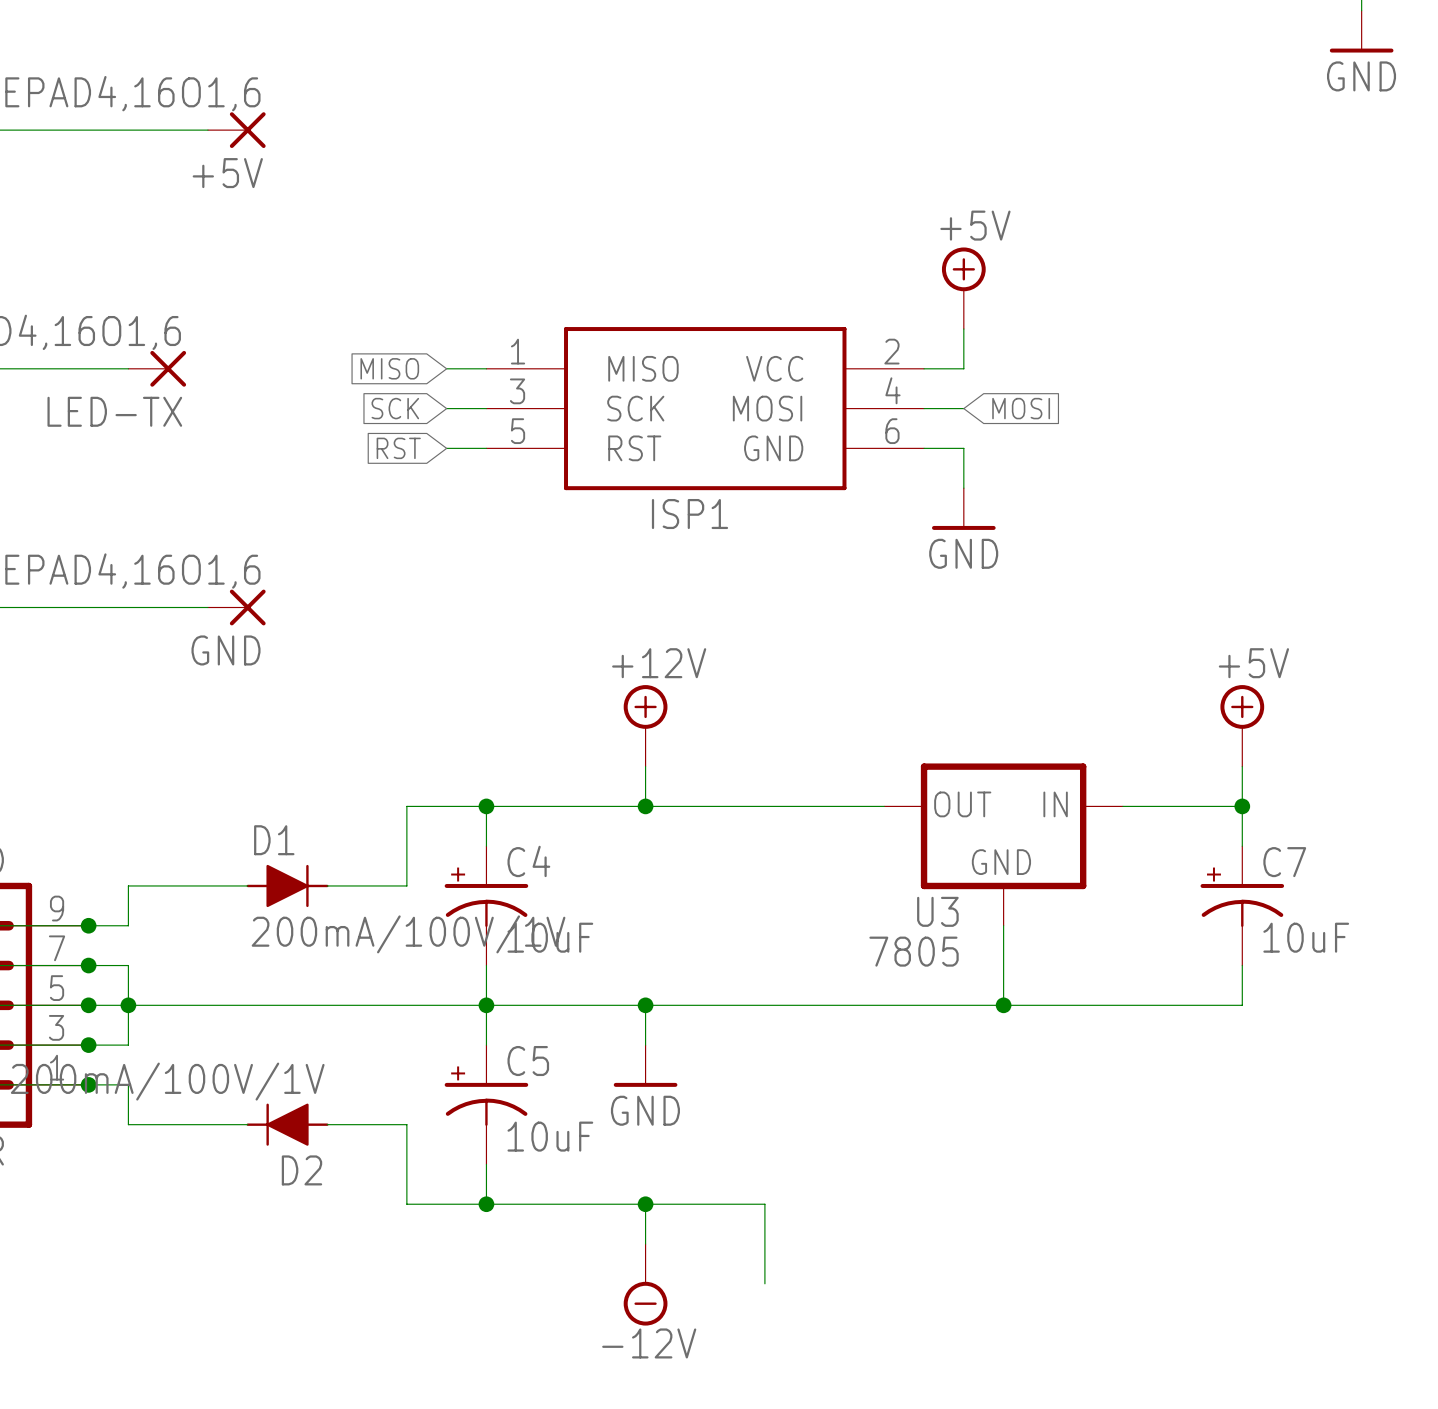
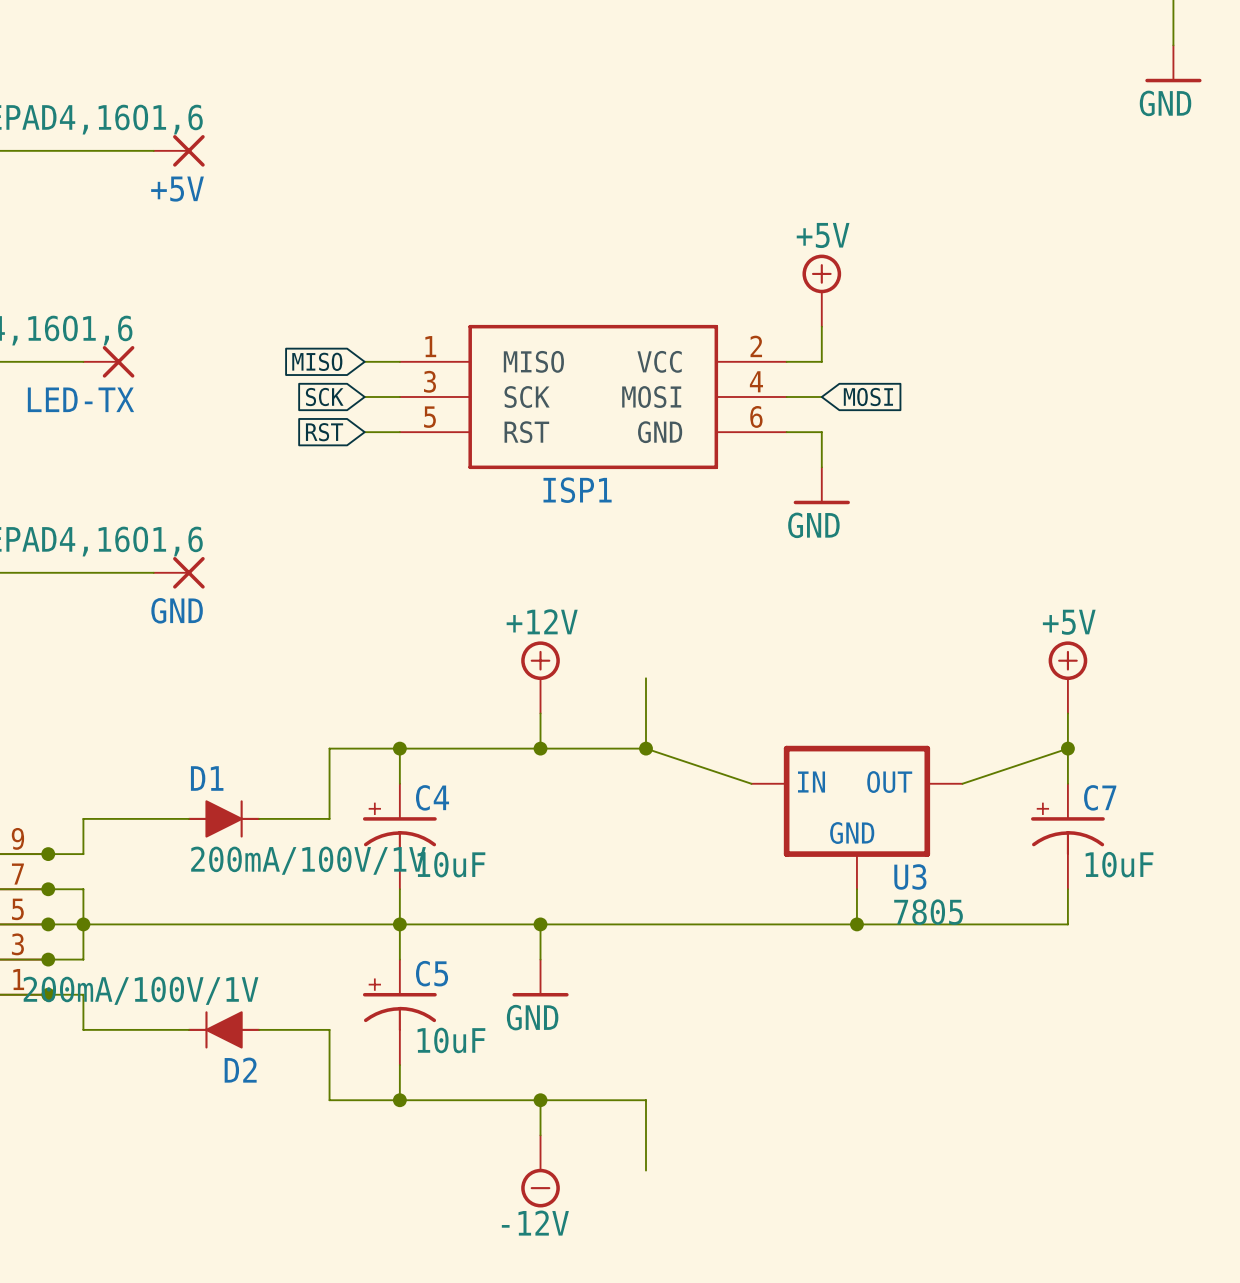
wire: none -> (646, 678) (646, 748) (751, 783)
wire: (764, 806) (884, 806) -> none
junction: none -> (646, 748)
wire: (1122, 806) (1242, 806) -> (962, 783) (1067, 748)
U3 flip: as is (1003, 826) -> left-right (856, 801)

